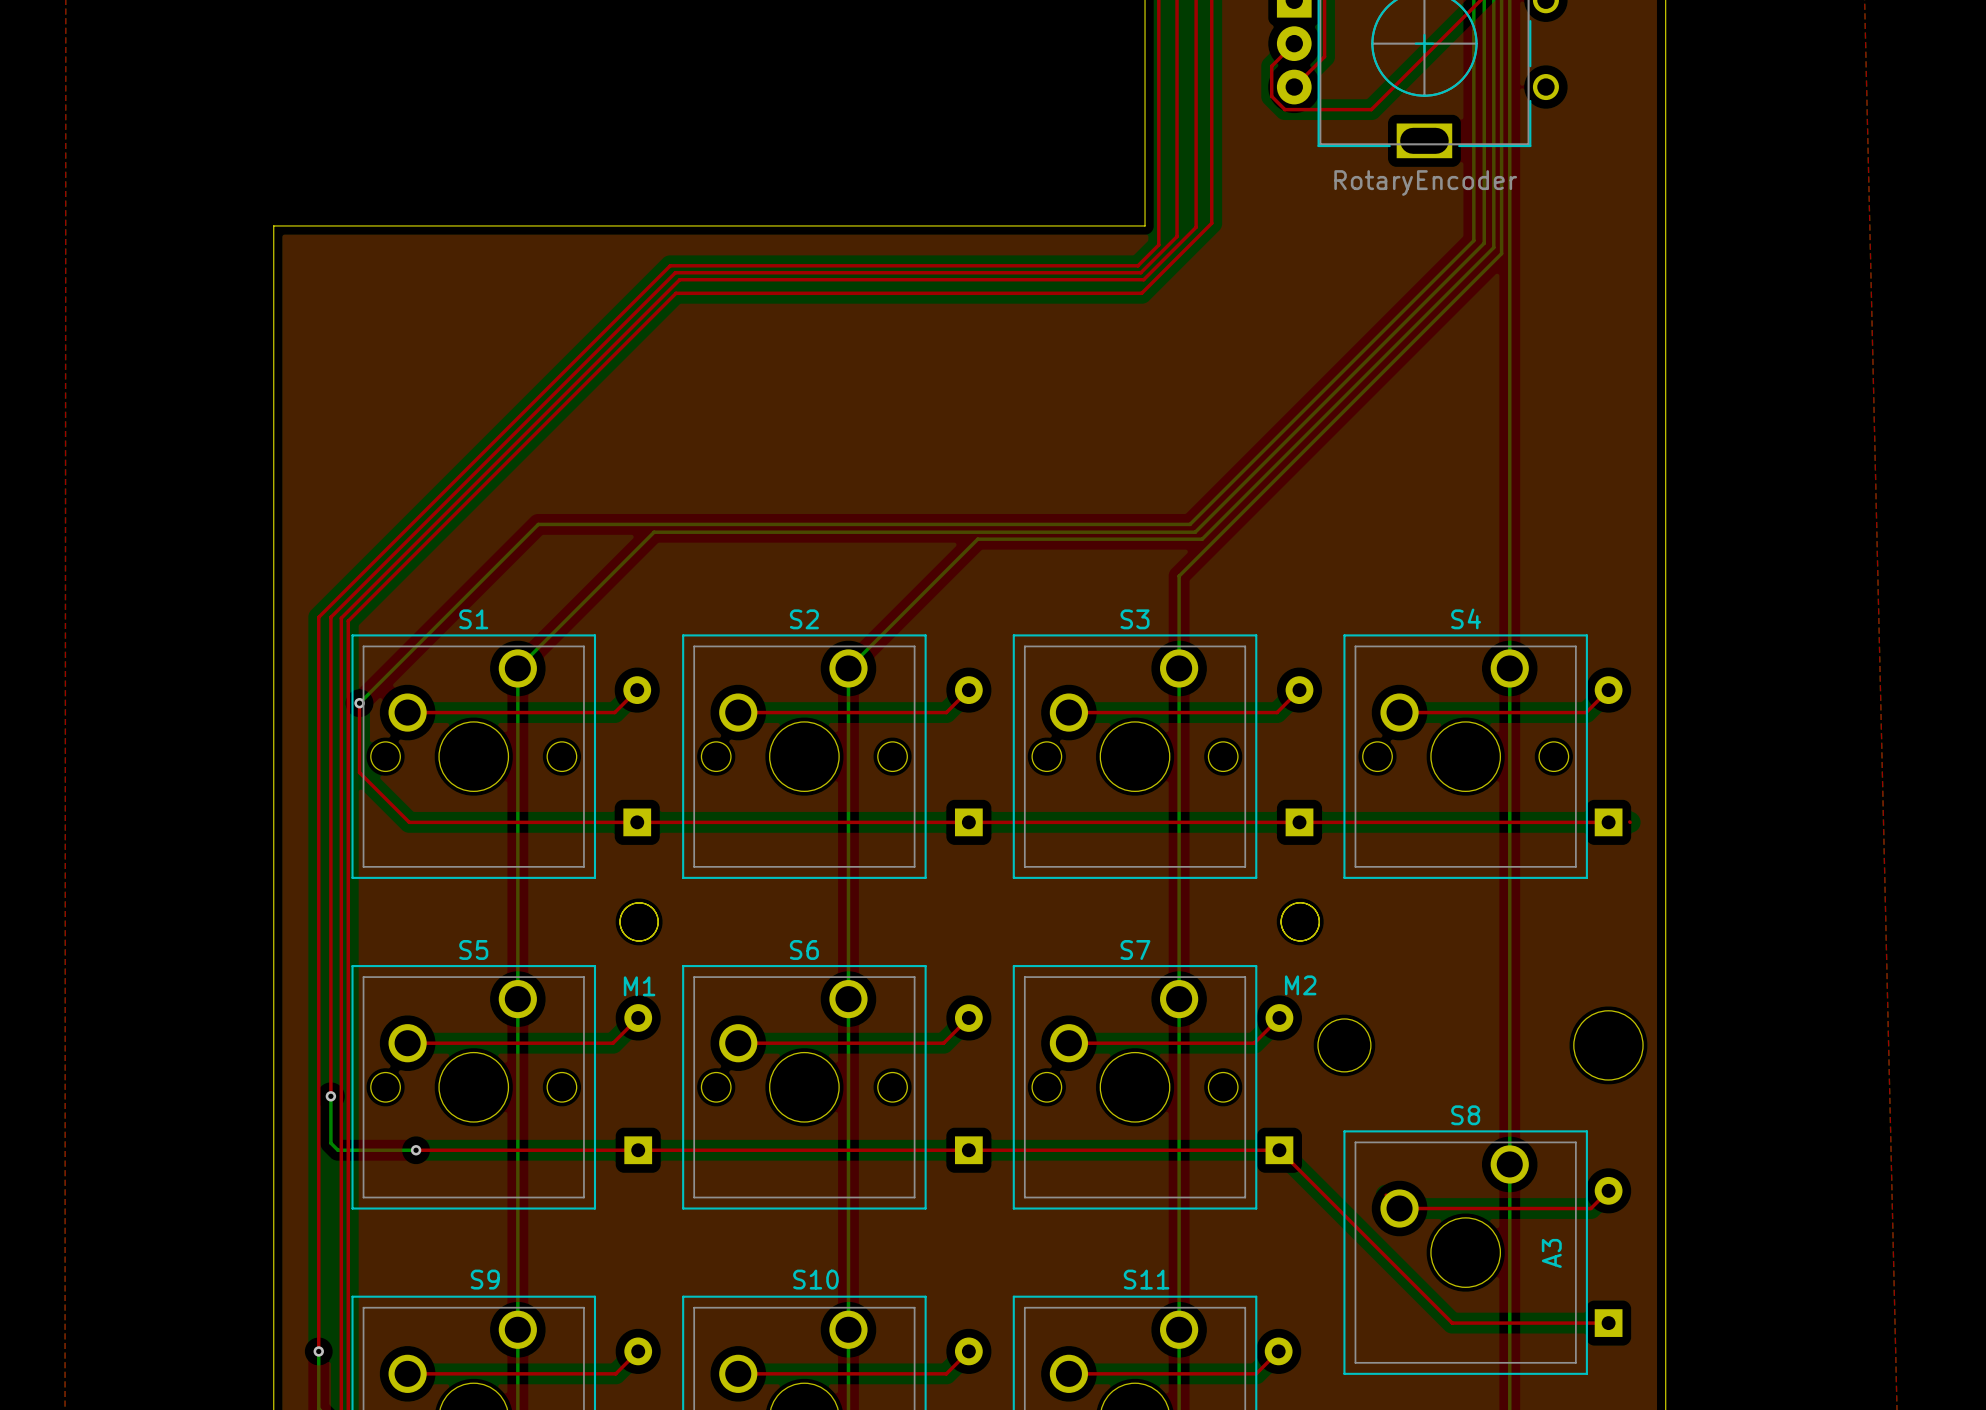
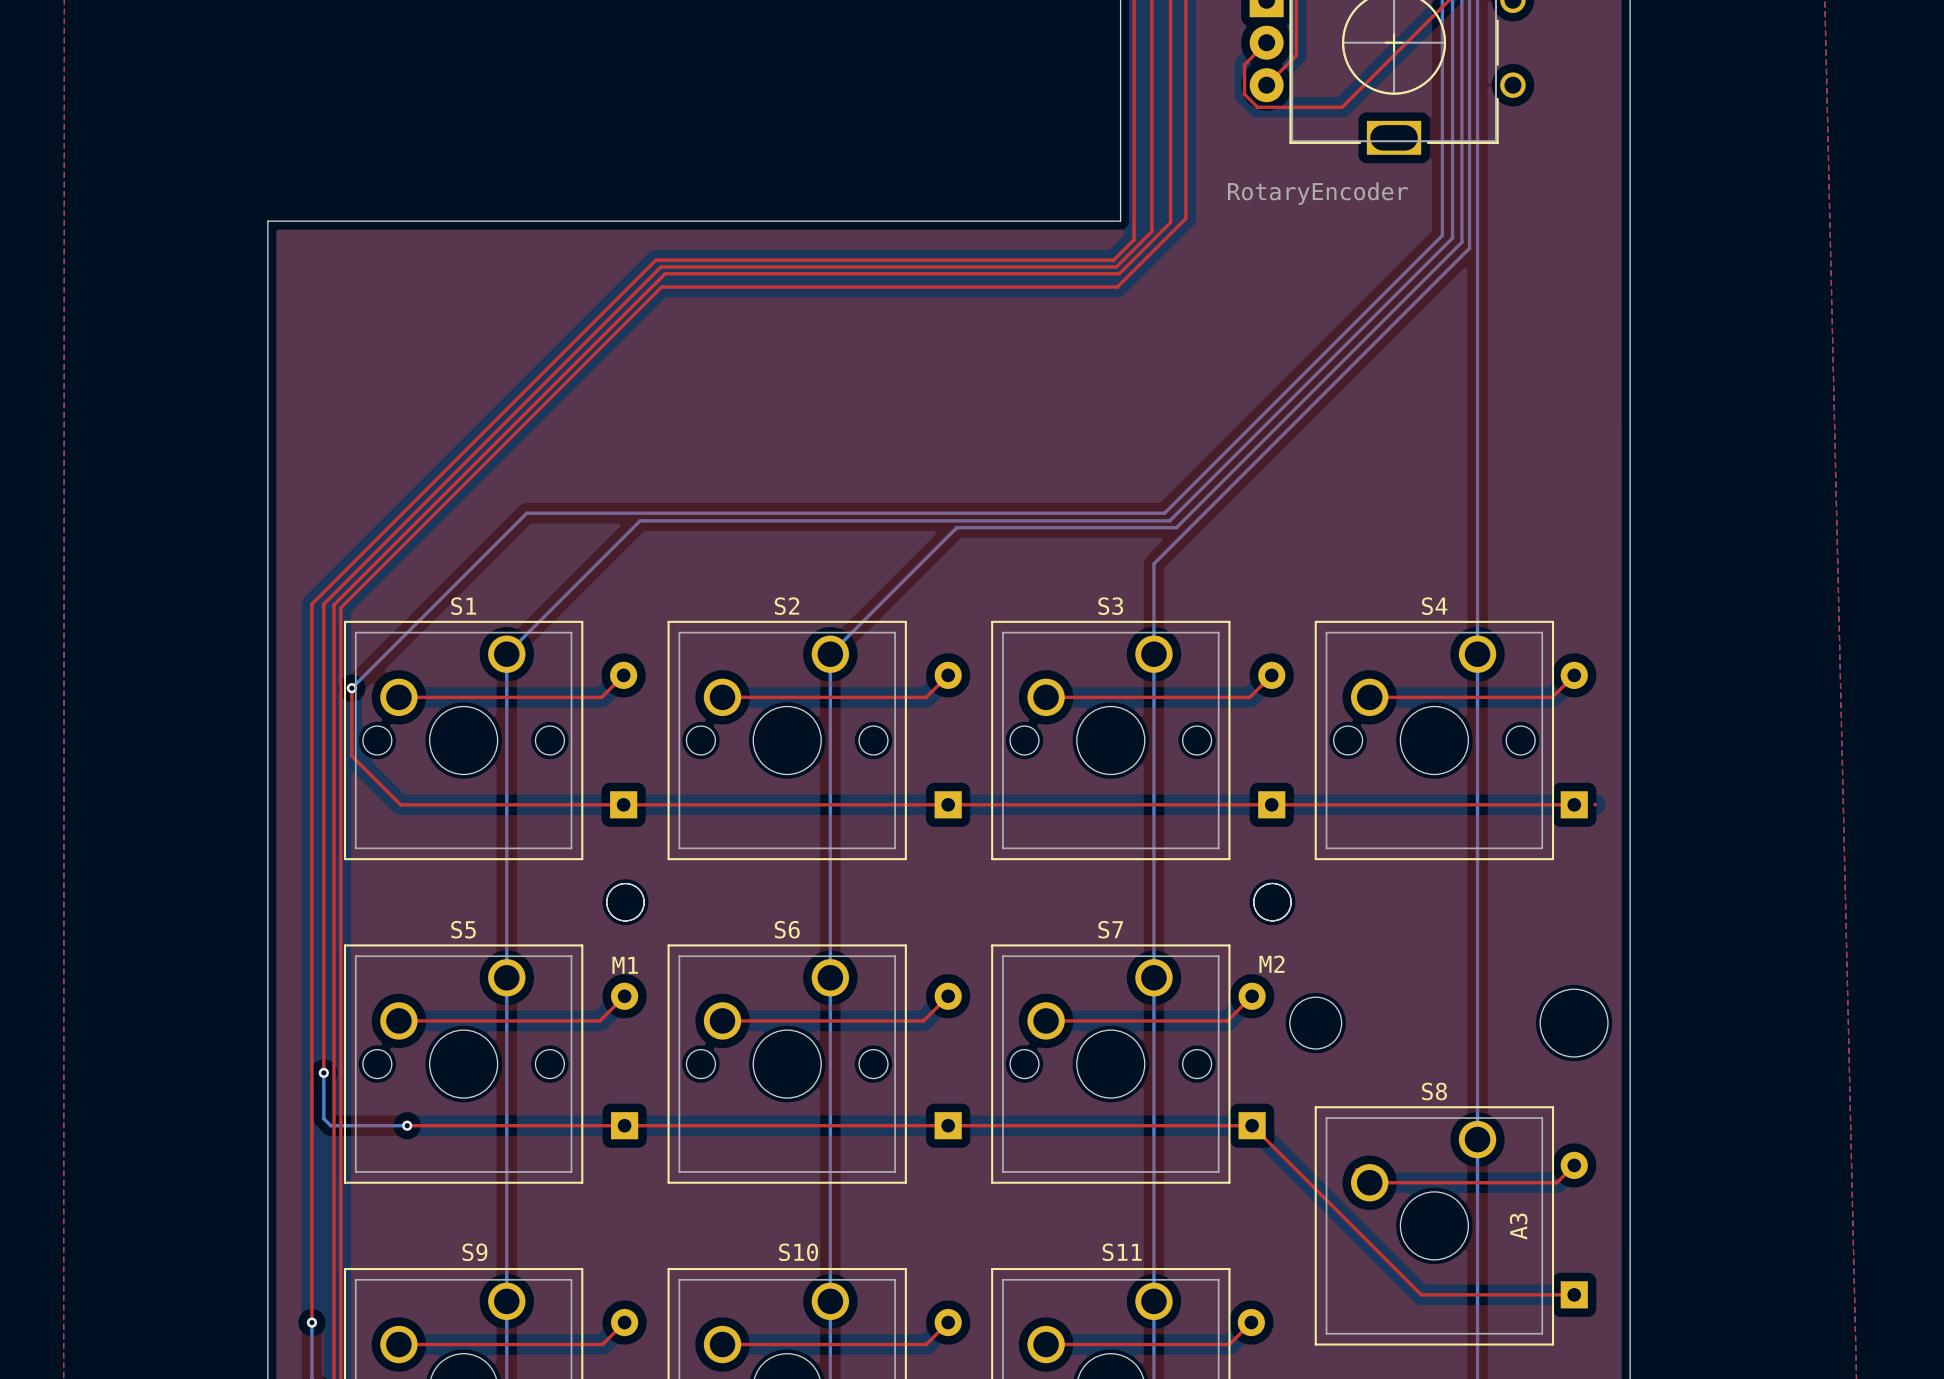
part value position: RotaryEncoder (1425, 183) -> RotaryEncoder (1317, 193)

